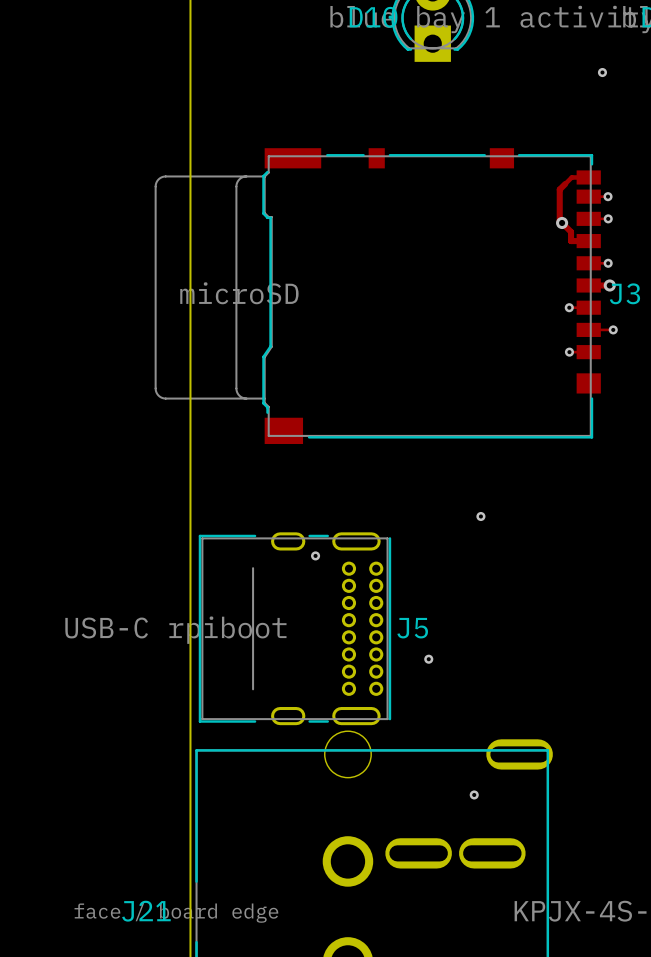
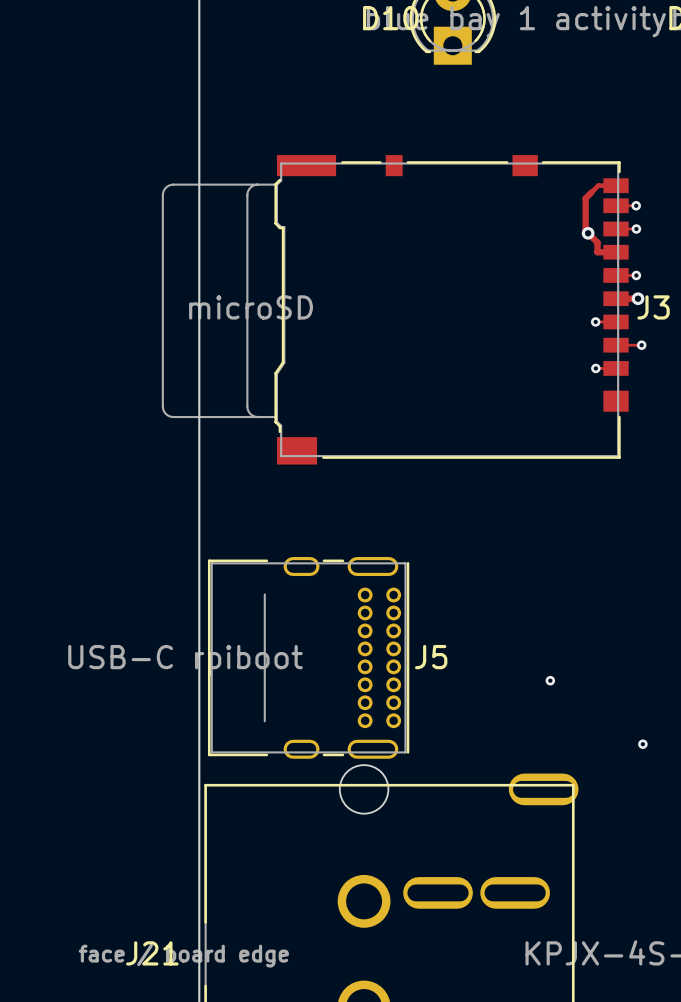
via: (602, 72) -> none
via: (480, 516) -> none
via: (315, 555) -> none
via: none -> (550, 680)
via: (428, 659) -> none
via: none -> (642, 744)
via: (474, 794) -> none

